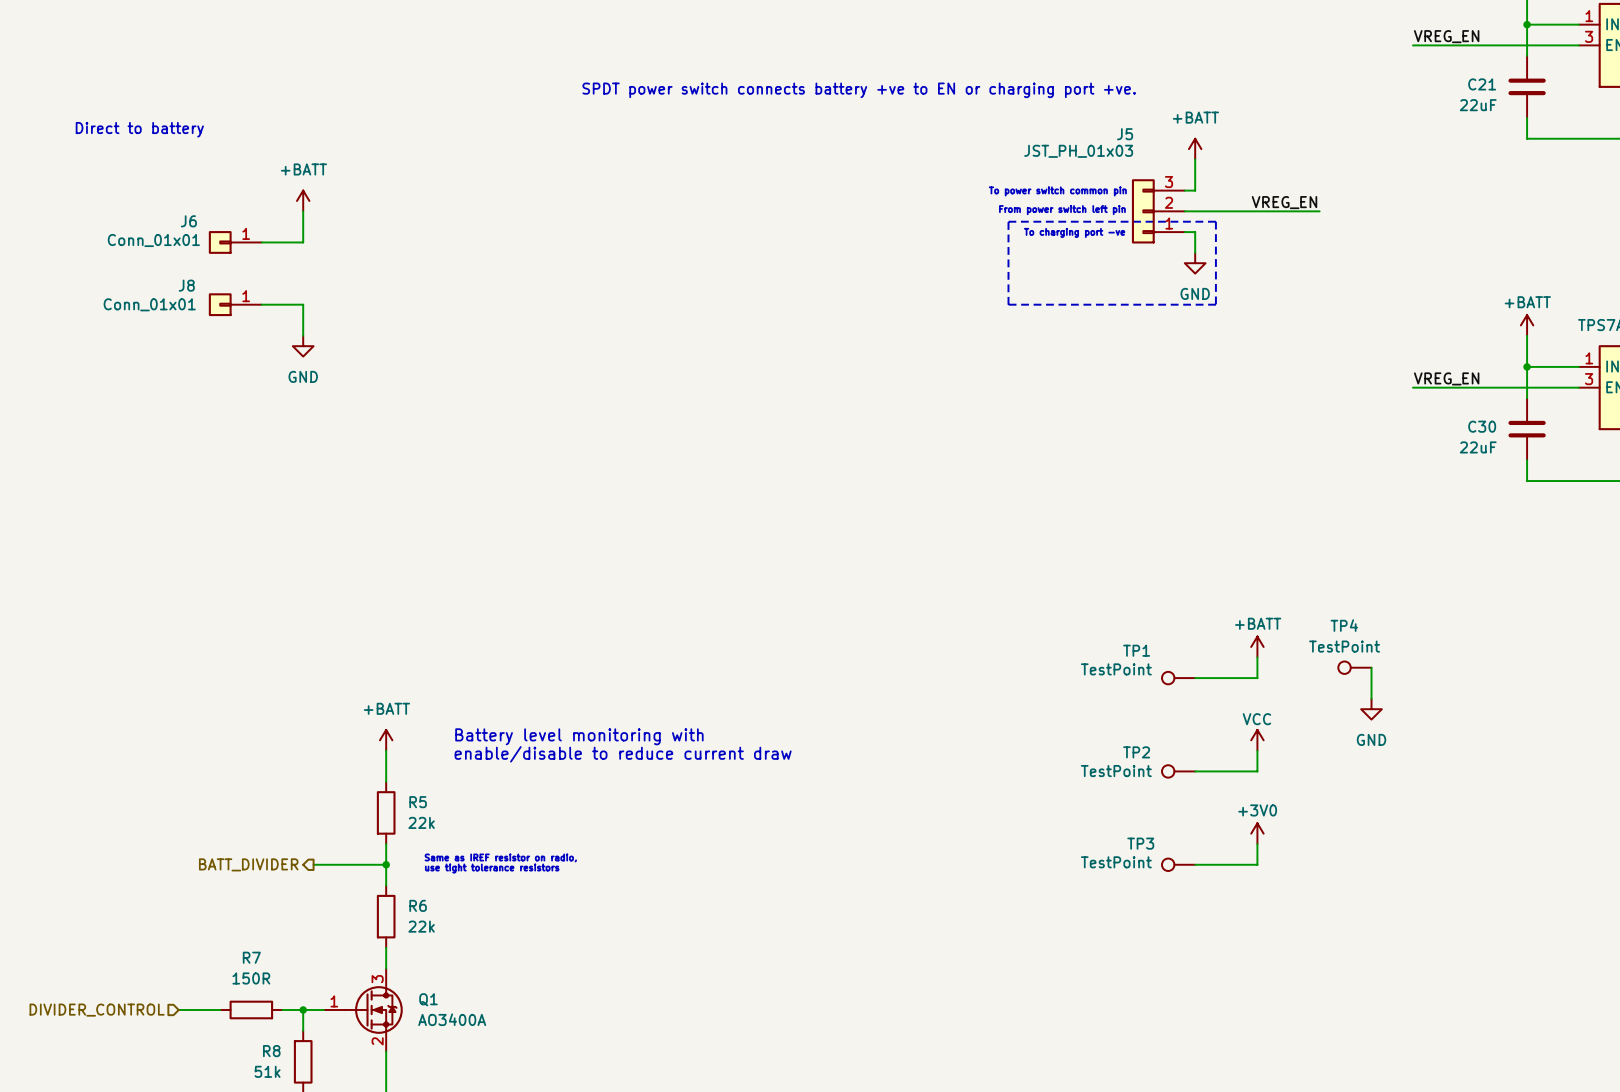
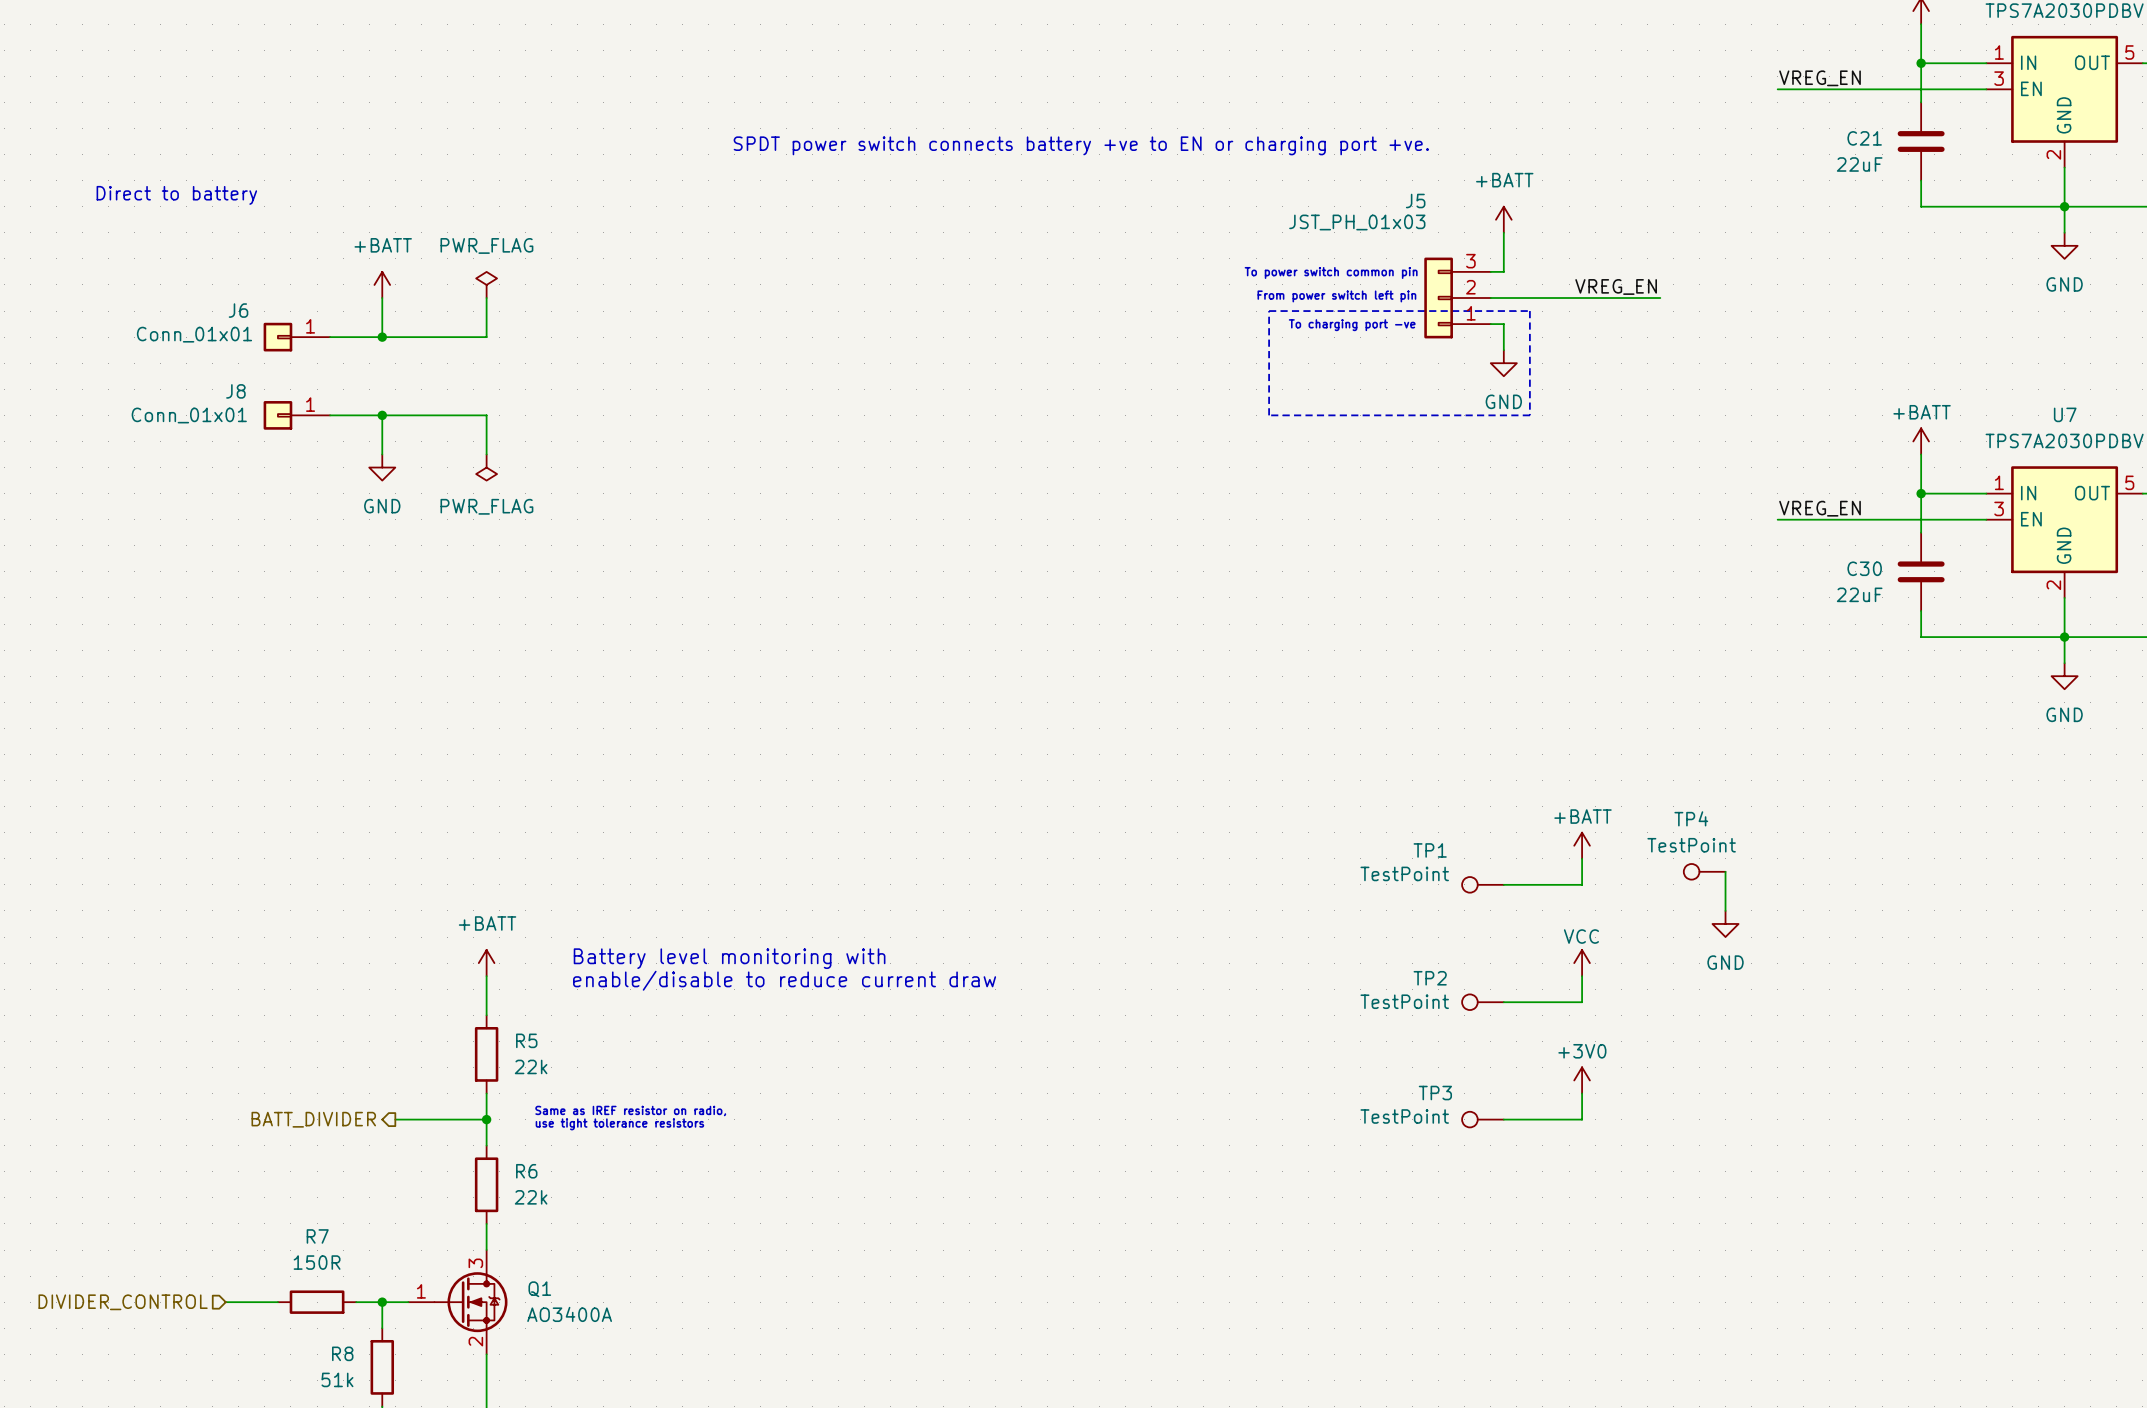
power symbol: none -> PWR_FLAG (486, 284)
wire: none -> (486, 298) (486, 337) (382, 337)
junction: none -> (382, 337)
wire: none -> (382, 415) (486, 415) (486, 454)
junction: none -> (382, 415)
power symbol: none -> PWR_FLAG (486, 467)

